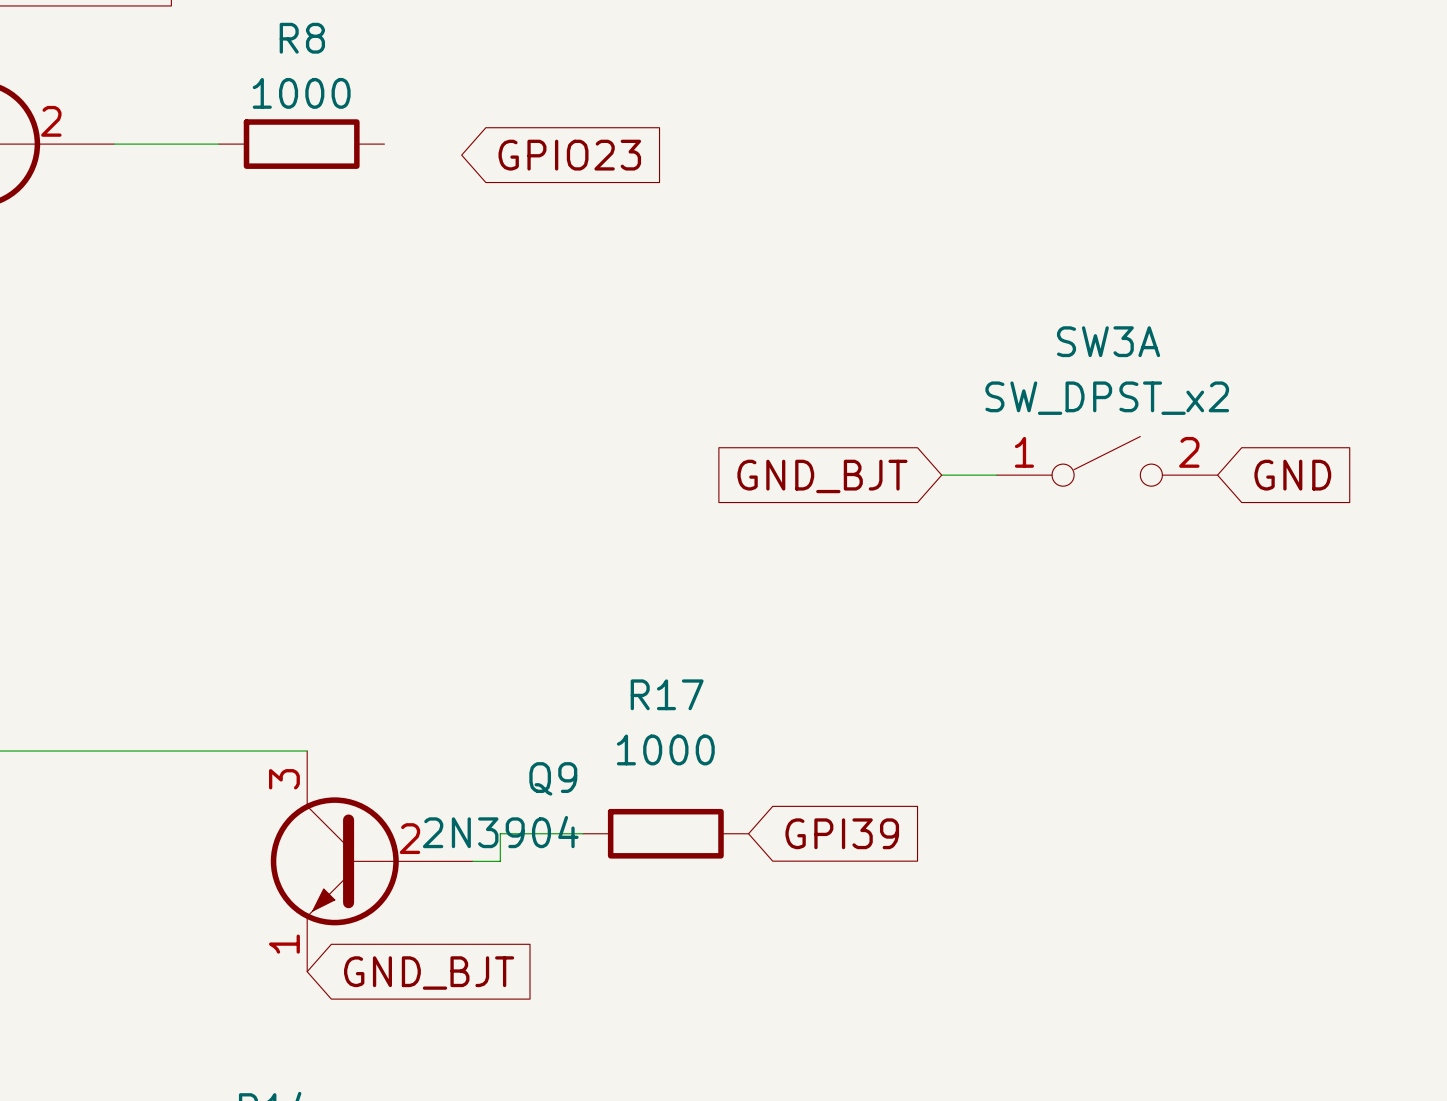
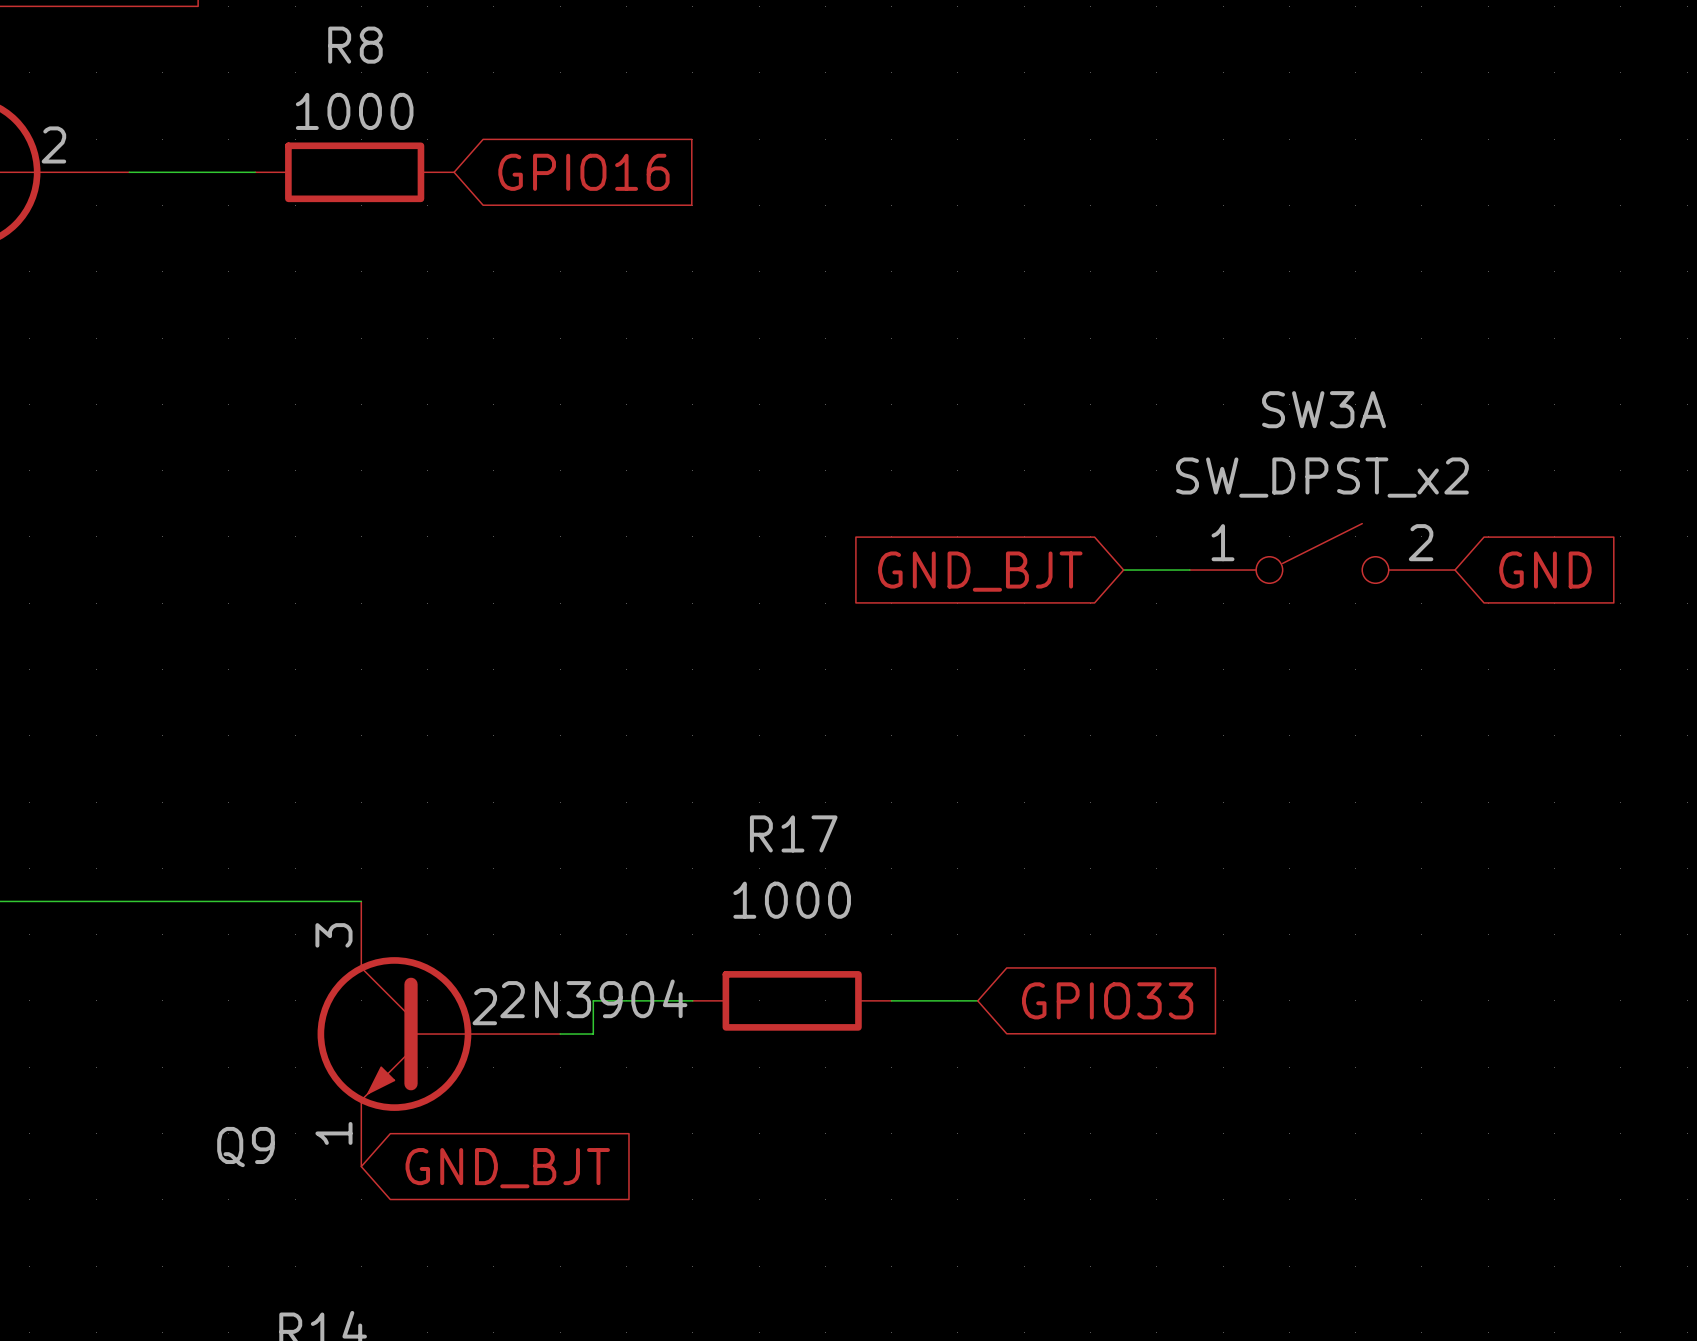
global label: GPIO23 (569, 155) -> GPIO16 (583, 172)
Q9 name position: Q9 (553, 778) -> Q9 (246, 1147)
wire: none -> (891, 1000) (977, 1000)
global label: GPI39 (842, 833) -> GPIO33 (1107, 1000)

